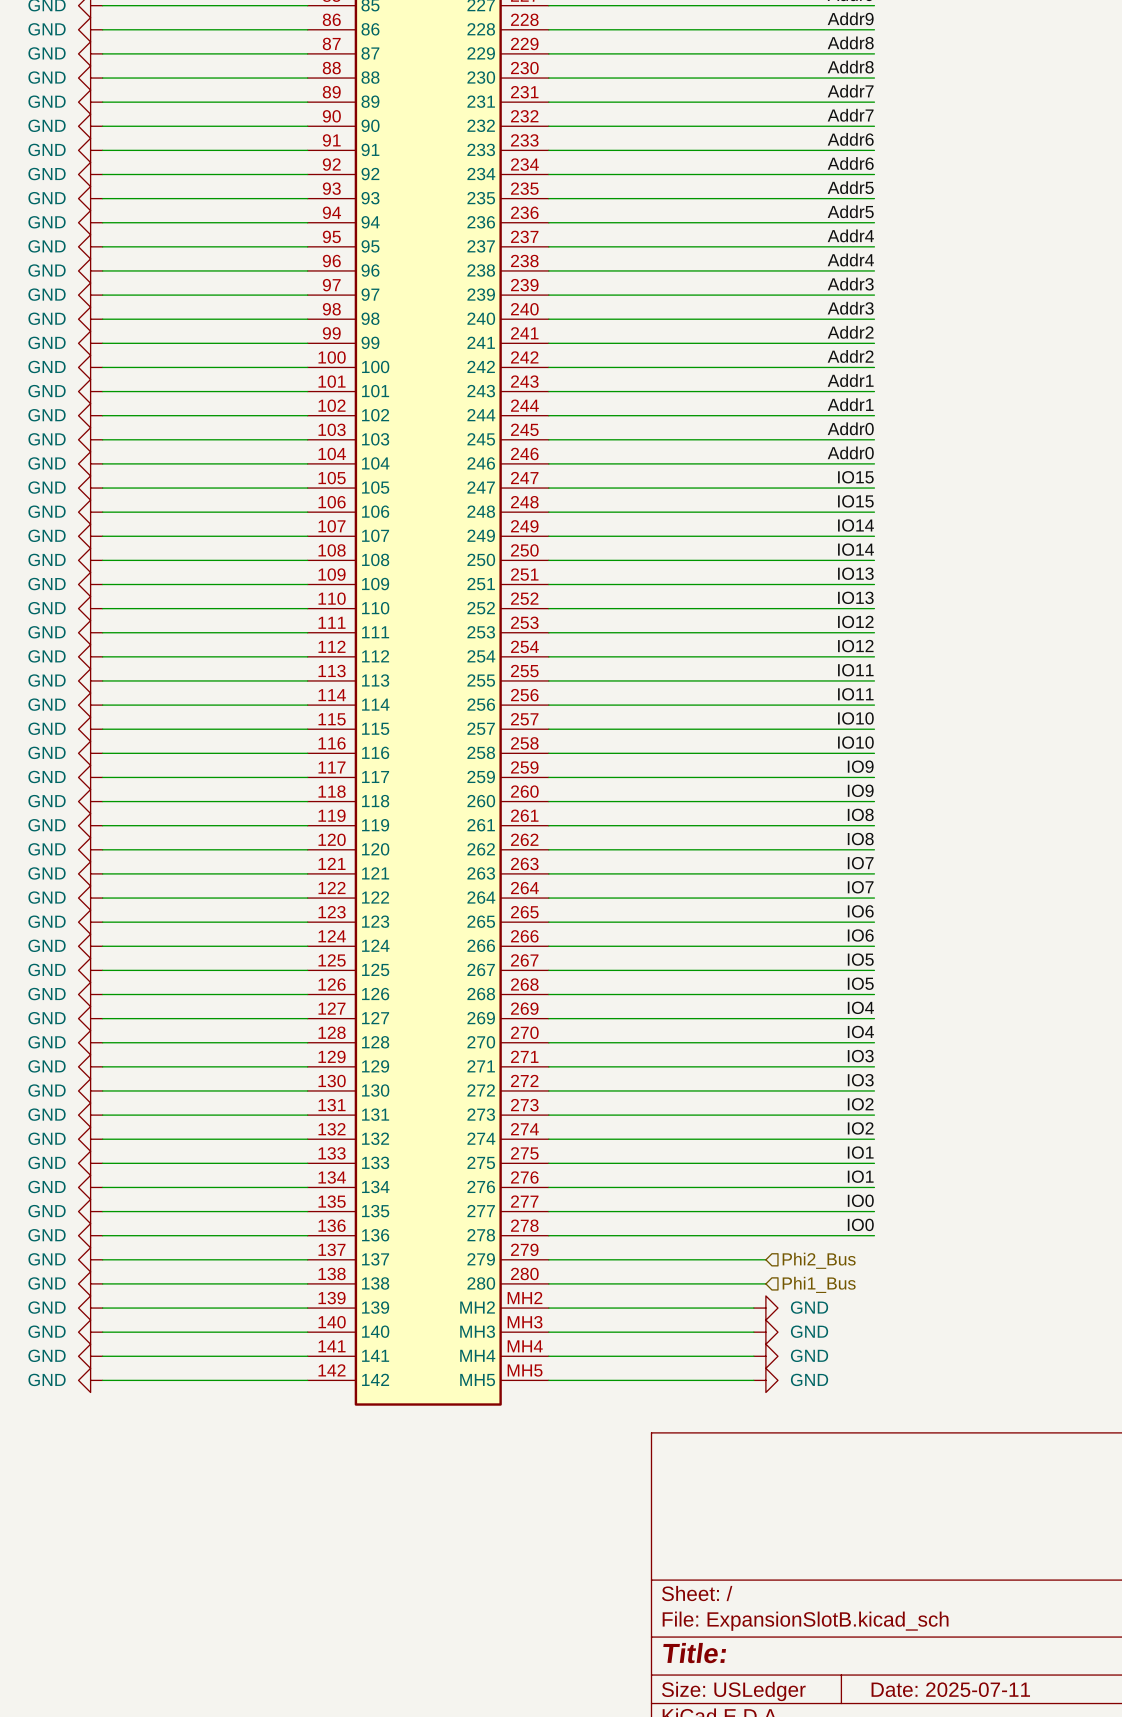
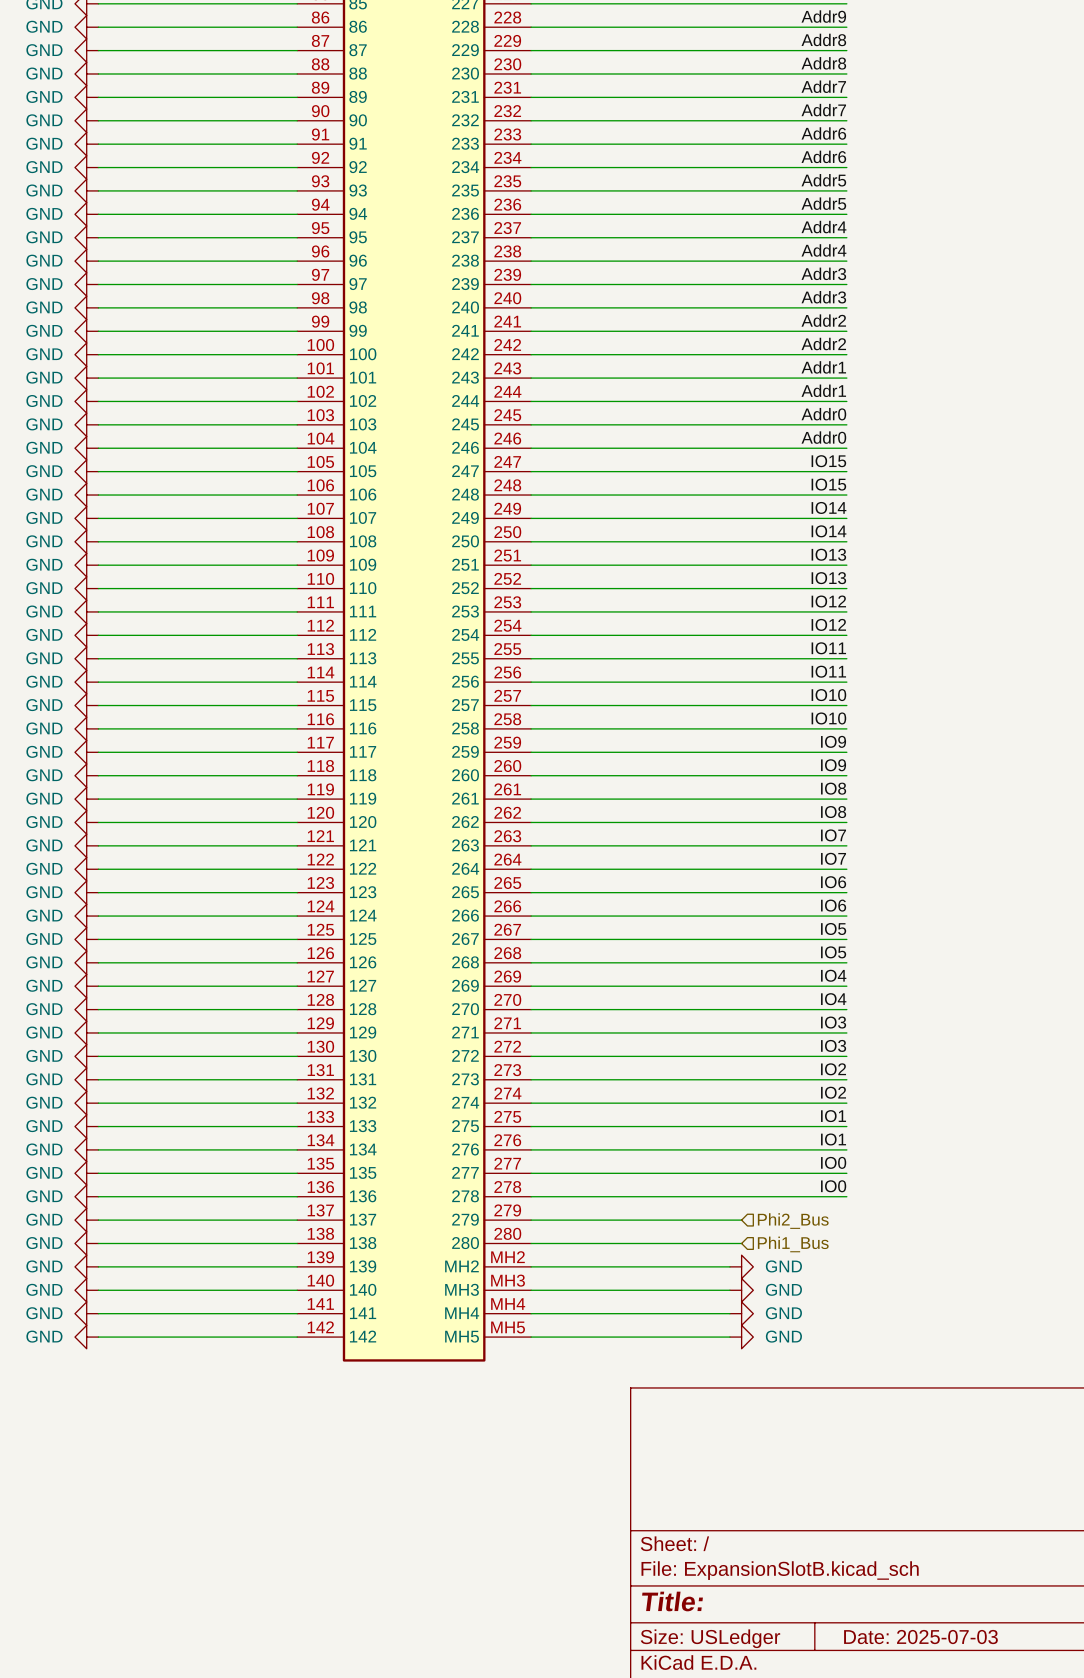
title block: Date: 2025-07-11 (950, 1689) -> Date: 2025-07-03 (920, 1637)

